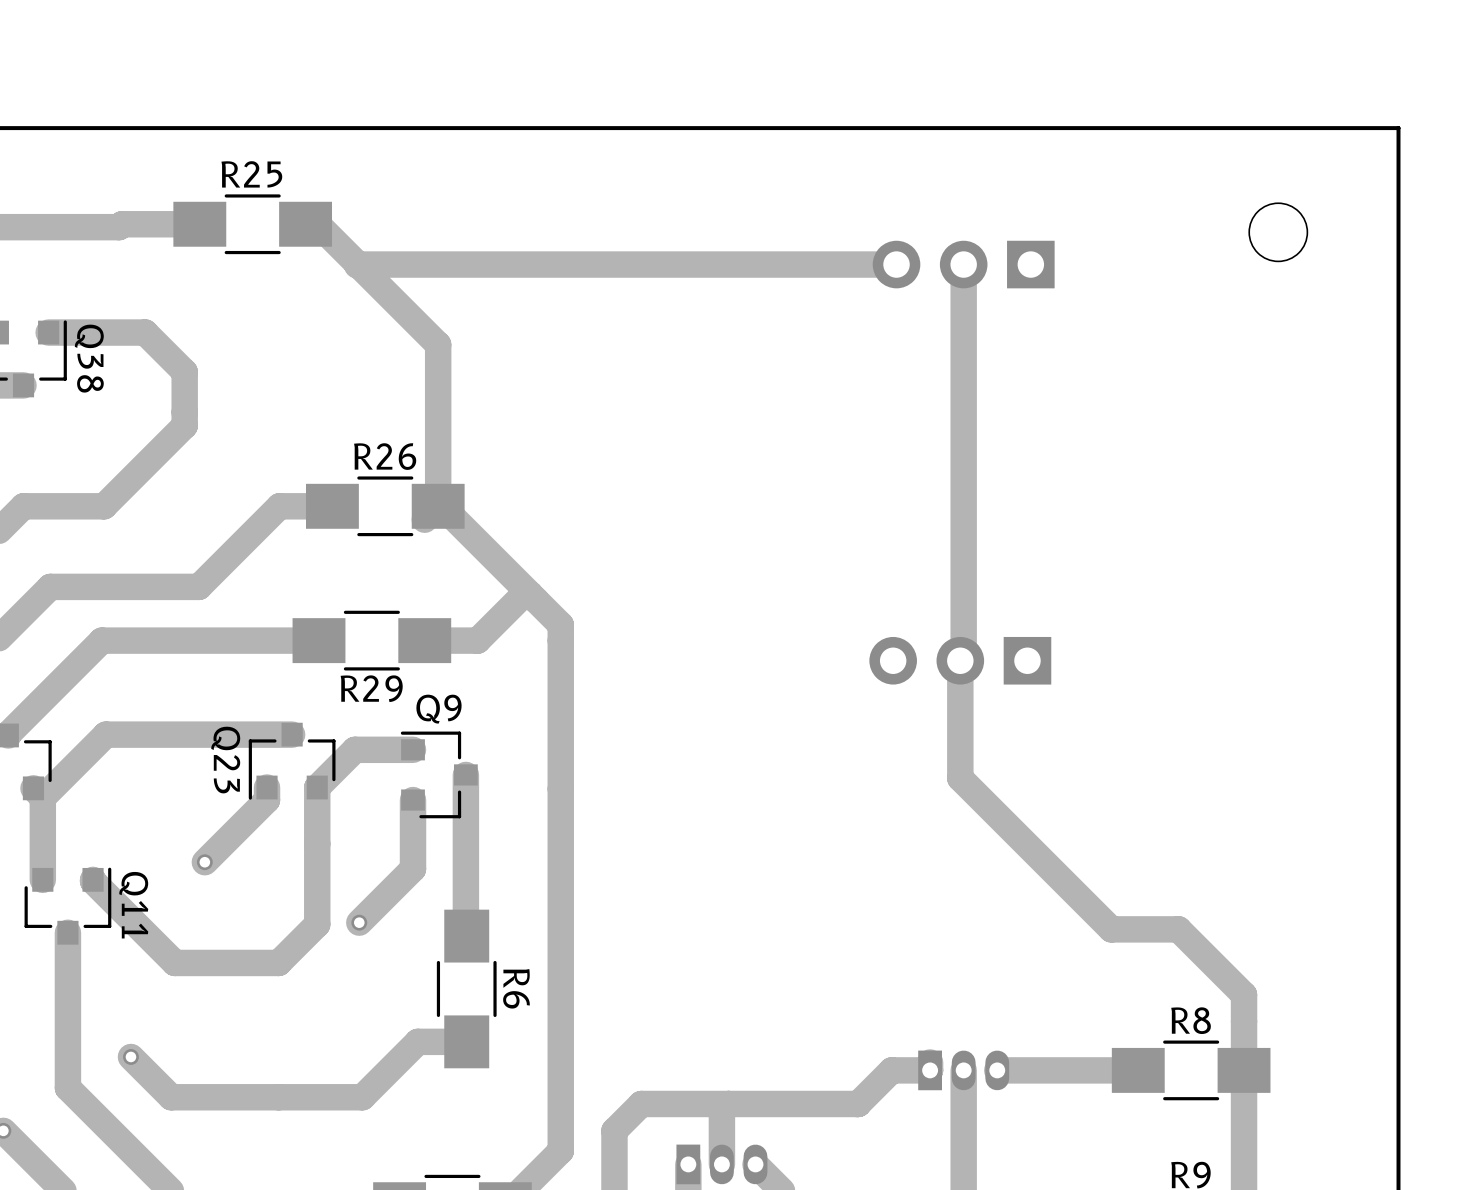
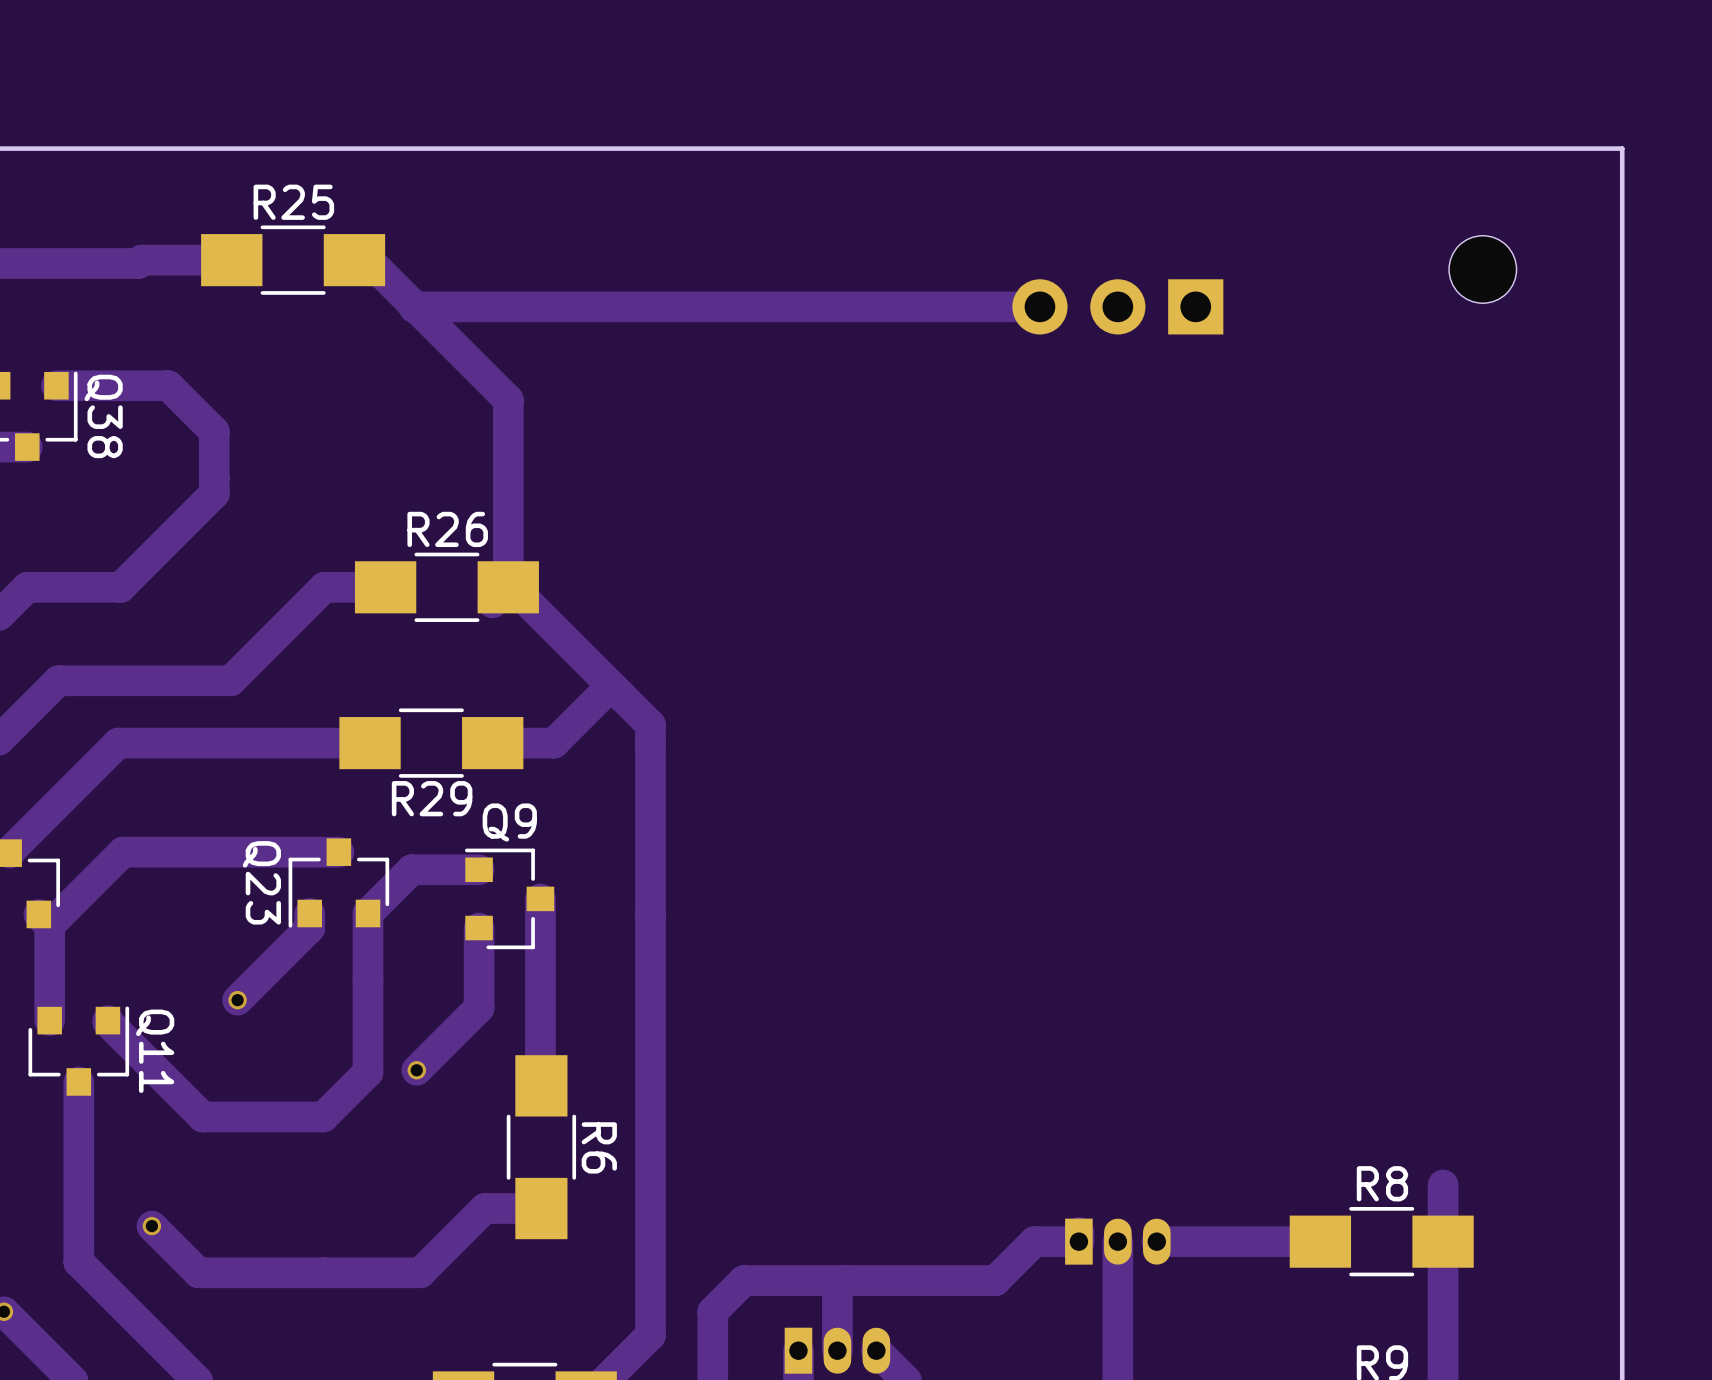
track: (963, 264) (963, 657) (960, 660) (960, 778) (1111, 929) (1178, 929) (1244, 994) (1244, 1021) -> none
part: (960, 660) -> none

